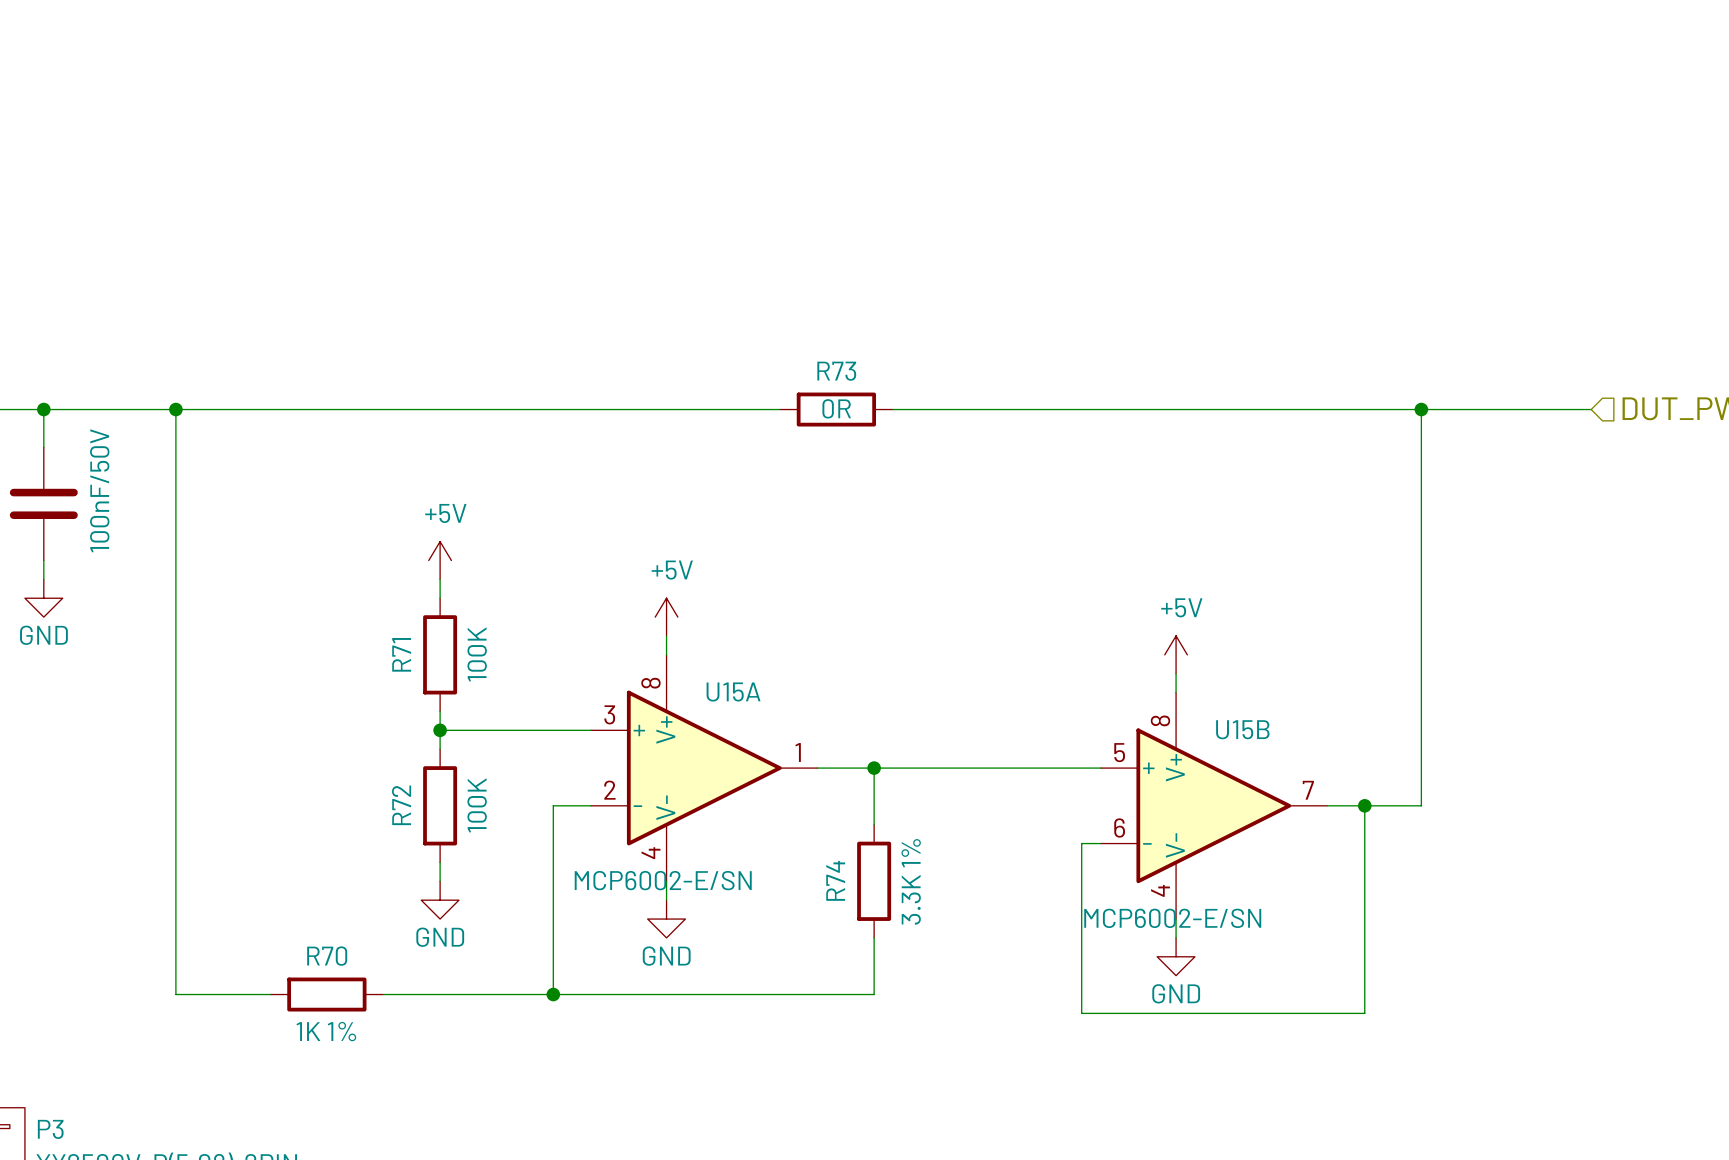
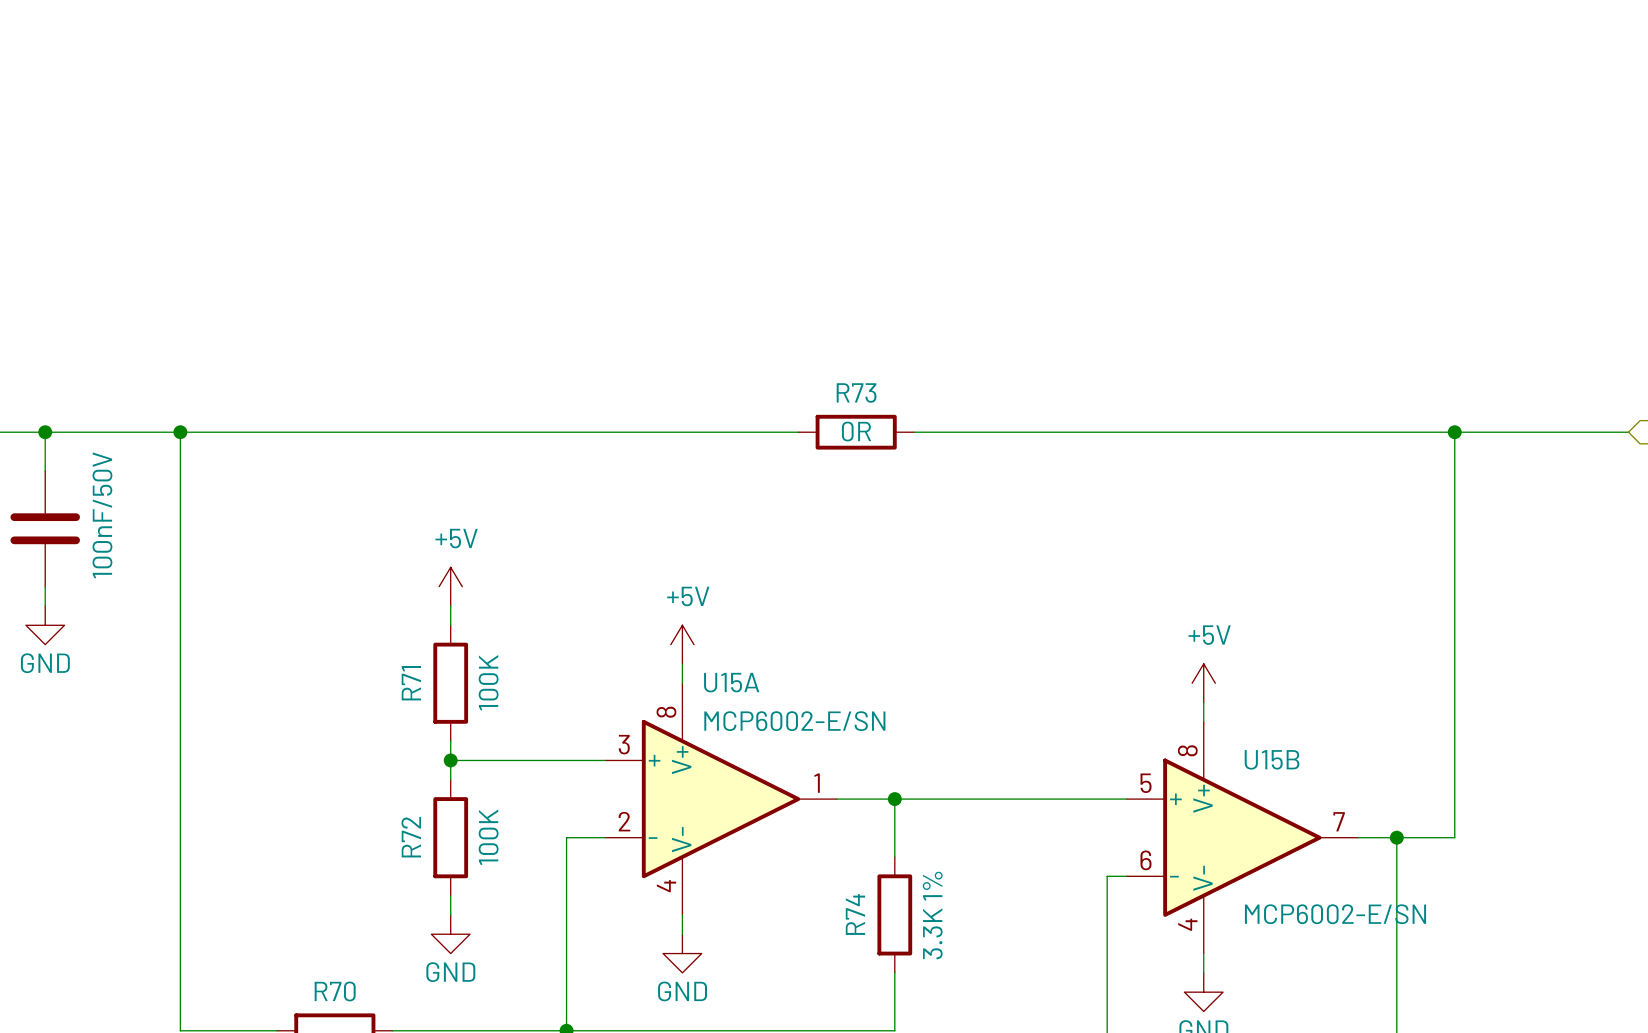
U15A name position: U15A (733, 692) -> U15A (731, 682)
U15A value position: MCP6002-E/SN (663, 880) -> MCP6002-E/SN (794, 721)
U15B value position: MCP6002-E/SN (1172, 918) -> MCP6002-E/SN (1335, 914)

